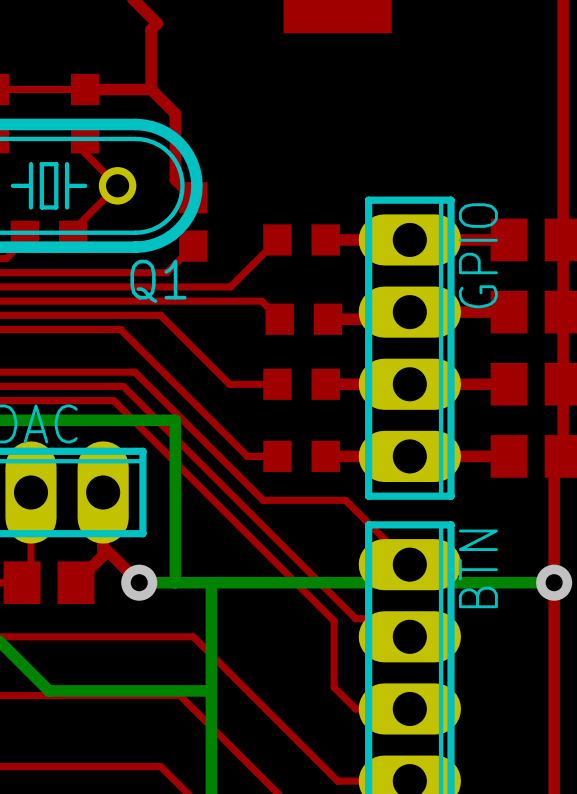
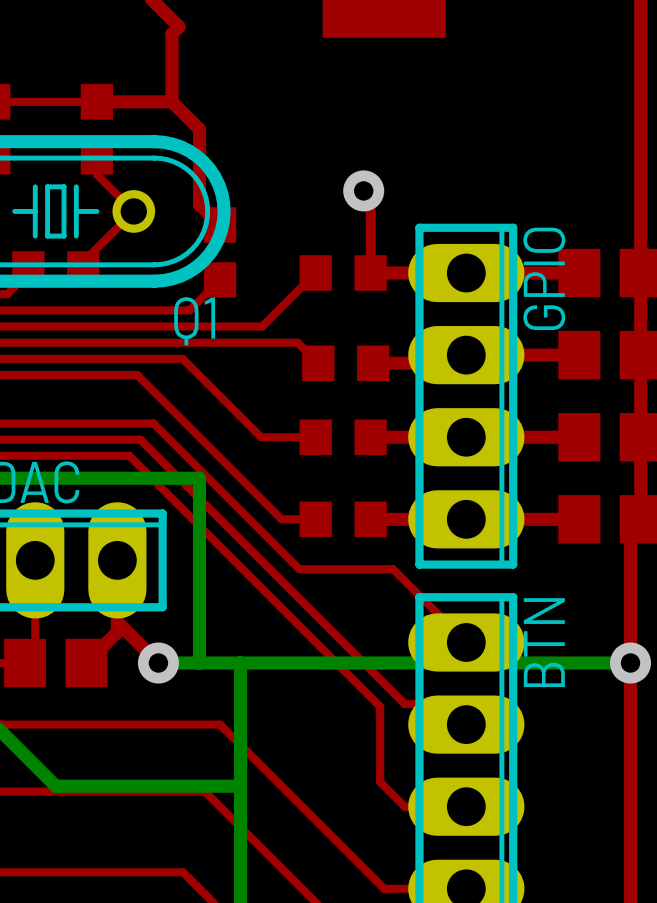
top track: none -> (363, 190) (370, 197) (370, 273)
via: none -> (363, 190)

